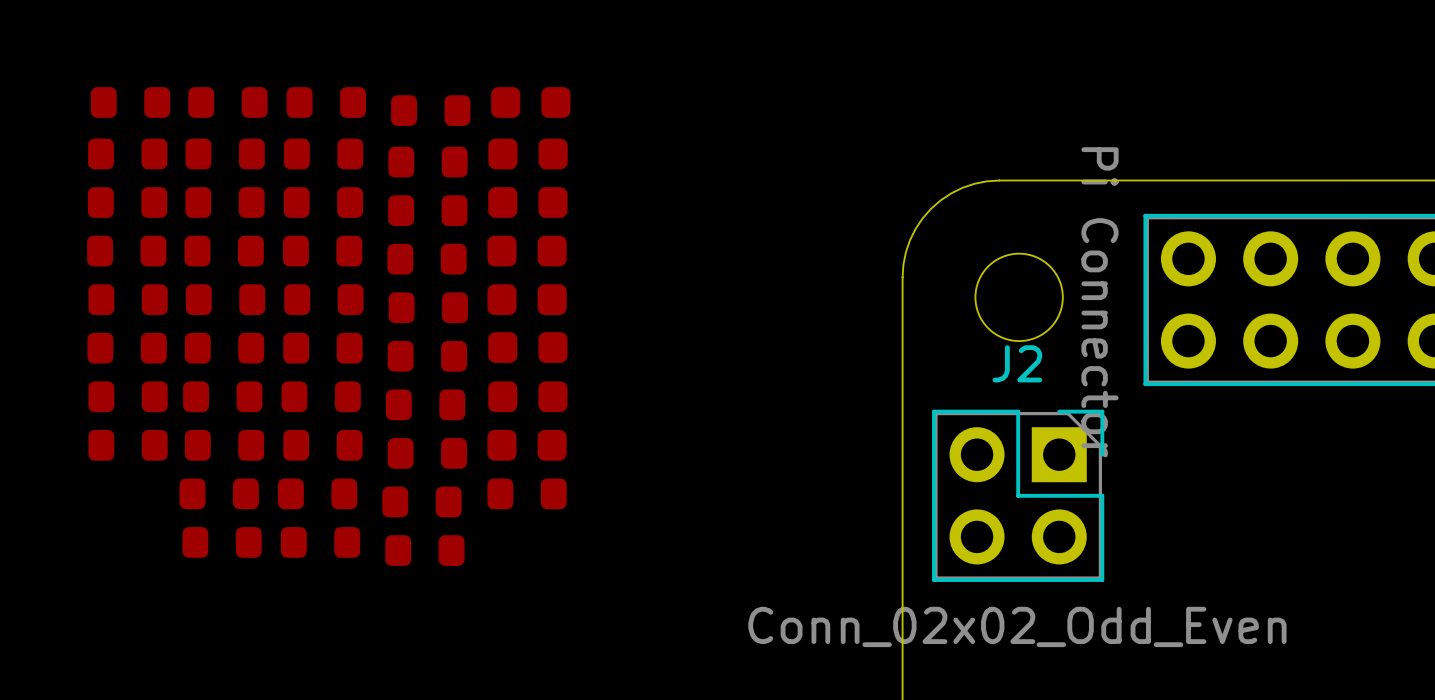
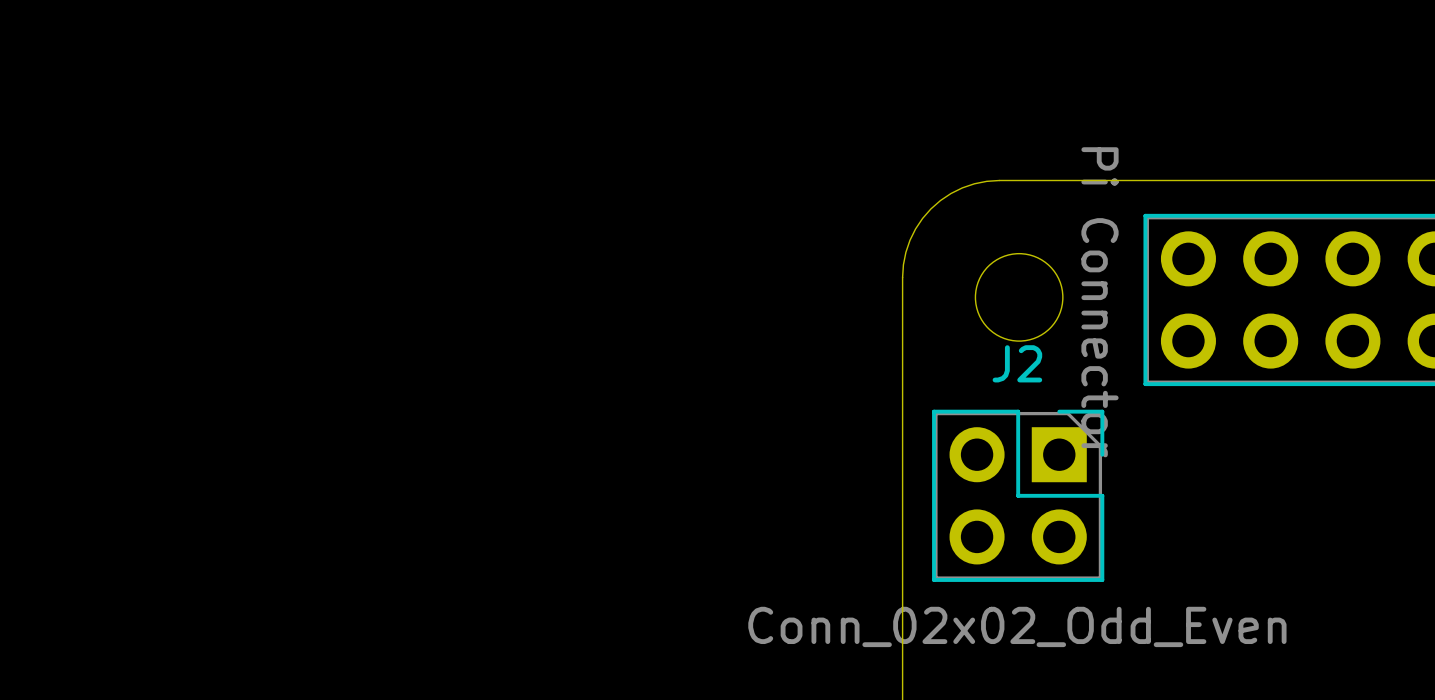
part: (130, 102) -> none
part: (227, 102) -> none
part: (326, 102) -> none
part: (530, 102) -> none
part: (430, 110) -> none
part: (127, 153) -> none
part: (225, 153) -> none
part: (323, 153) -> none
part: (528, 153) -> none
part: (428, 162) -> none
part: (127, 202) -> none
part: (225, 202) -> none
part: (323, 202) -> none
part: (527, 202) -> none
part: (427, 210) -> none
part: (126, 251) -> none
part: (224, 251) -> none
part: (322, 251) -> none
part: (527, 251) -> none
part: (427, 259) -> none
part: (128, 299) -> none
part: (225, 299) -> none
part: (323, 299) -> none
part: (527, 299) -> none
part: (428, 307) -> none
part: (527, 347) -> none
part: (127, 348) -> none
part: (224, 348) -> none
part: (322, 348) -> none
part: (427, 356) -> none
part: (128, 396) -> none
part: (222, 396) -> none
part: (321, 396) -> none
part: (527, 396) -> none
part: (425, 404) -> none
part: (128, 445) -> none
part: (224, 445) -> none
part: (322, 445) -> none
part: (527, 445) -> none
part: (427, 453) -> none
part: (219, 493) -> none
part: (317, 493) -> none
part: (527, 493) -> none
part: (422, 501) -> none
part: (222, 542) -> none
part: (320, 542) -> none
part: (424, 550) -> none

